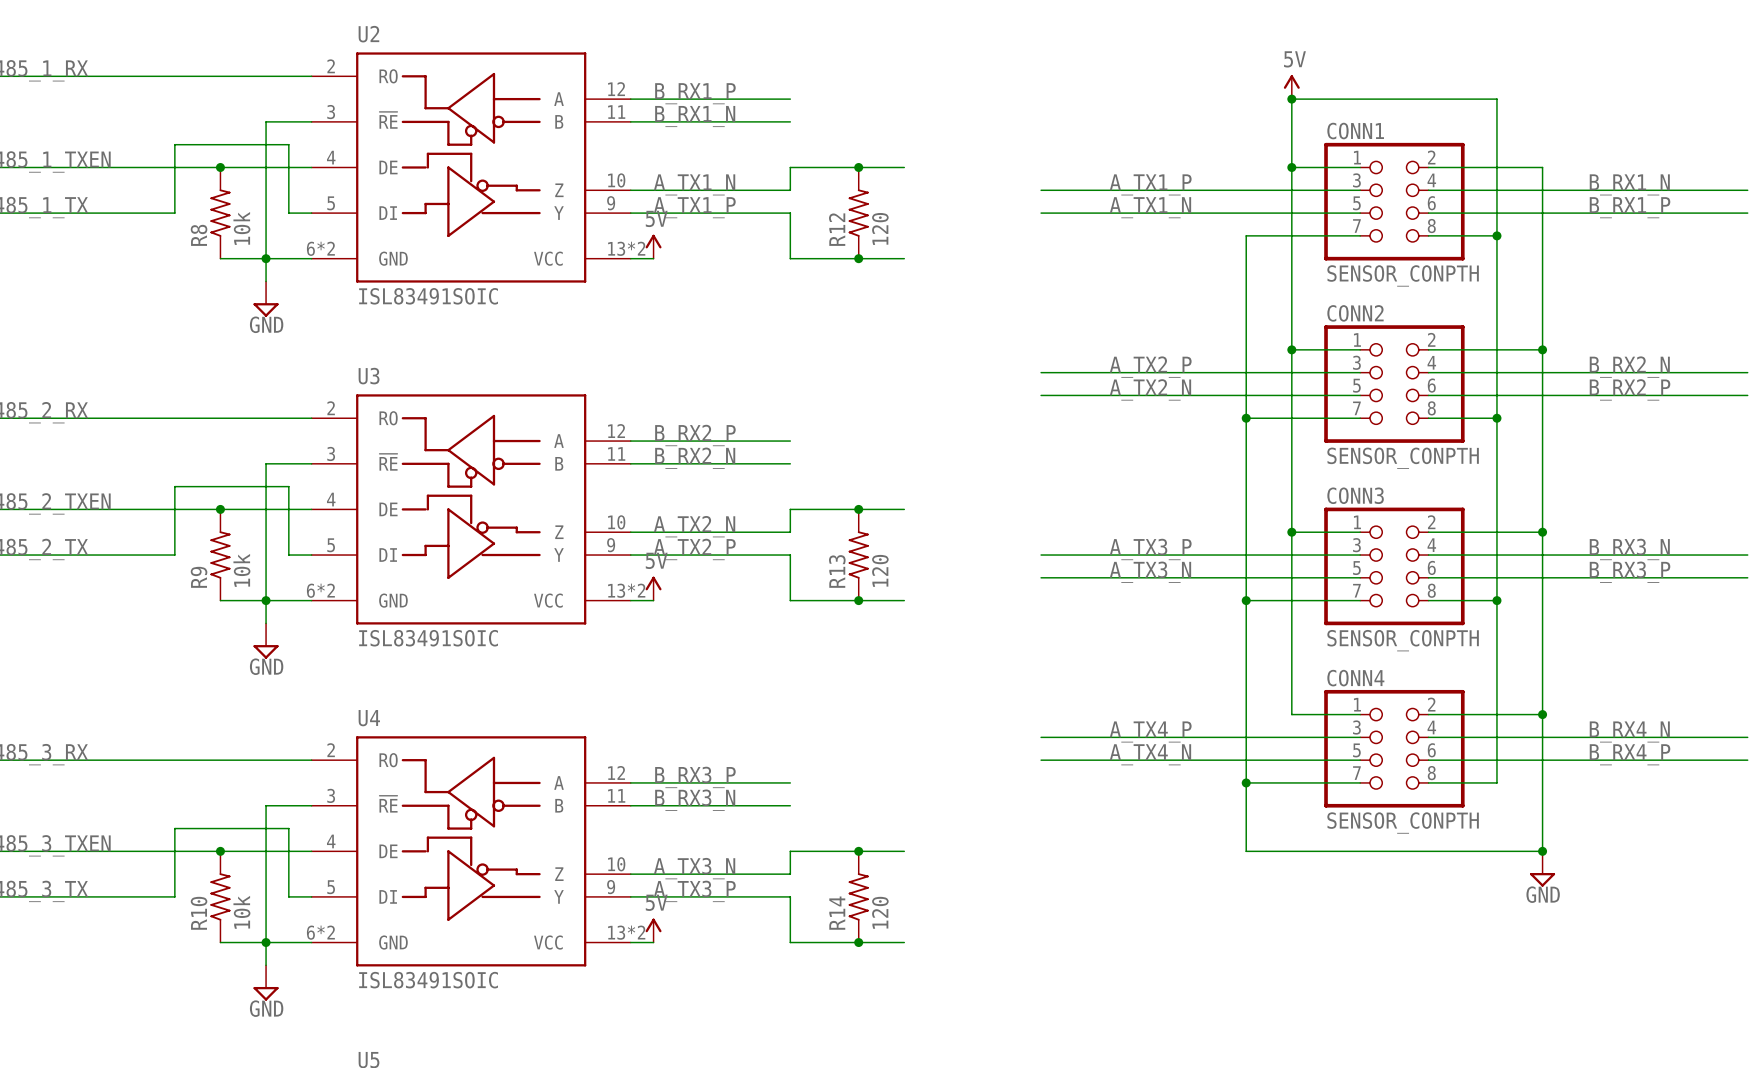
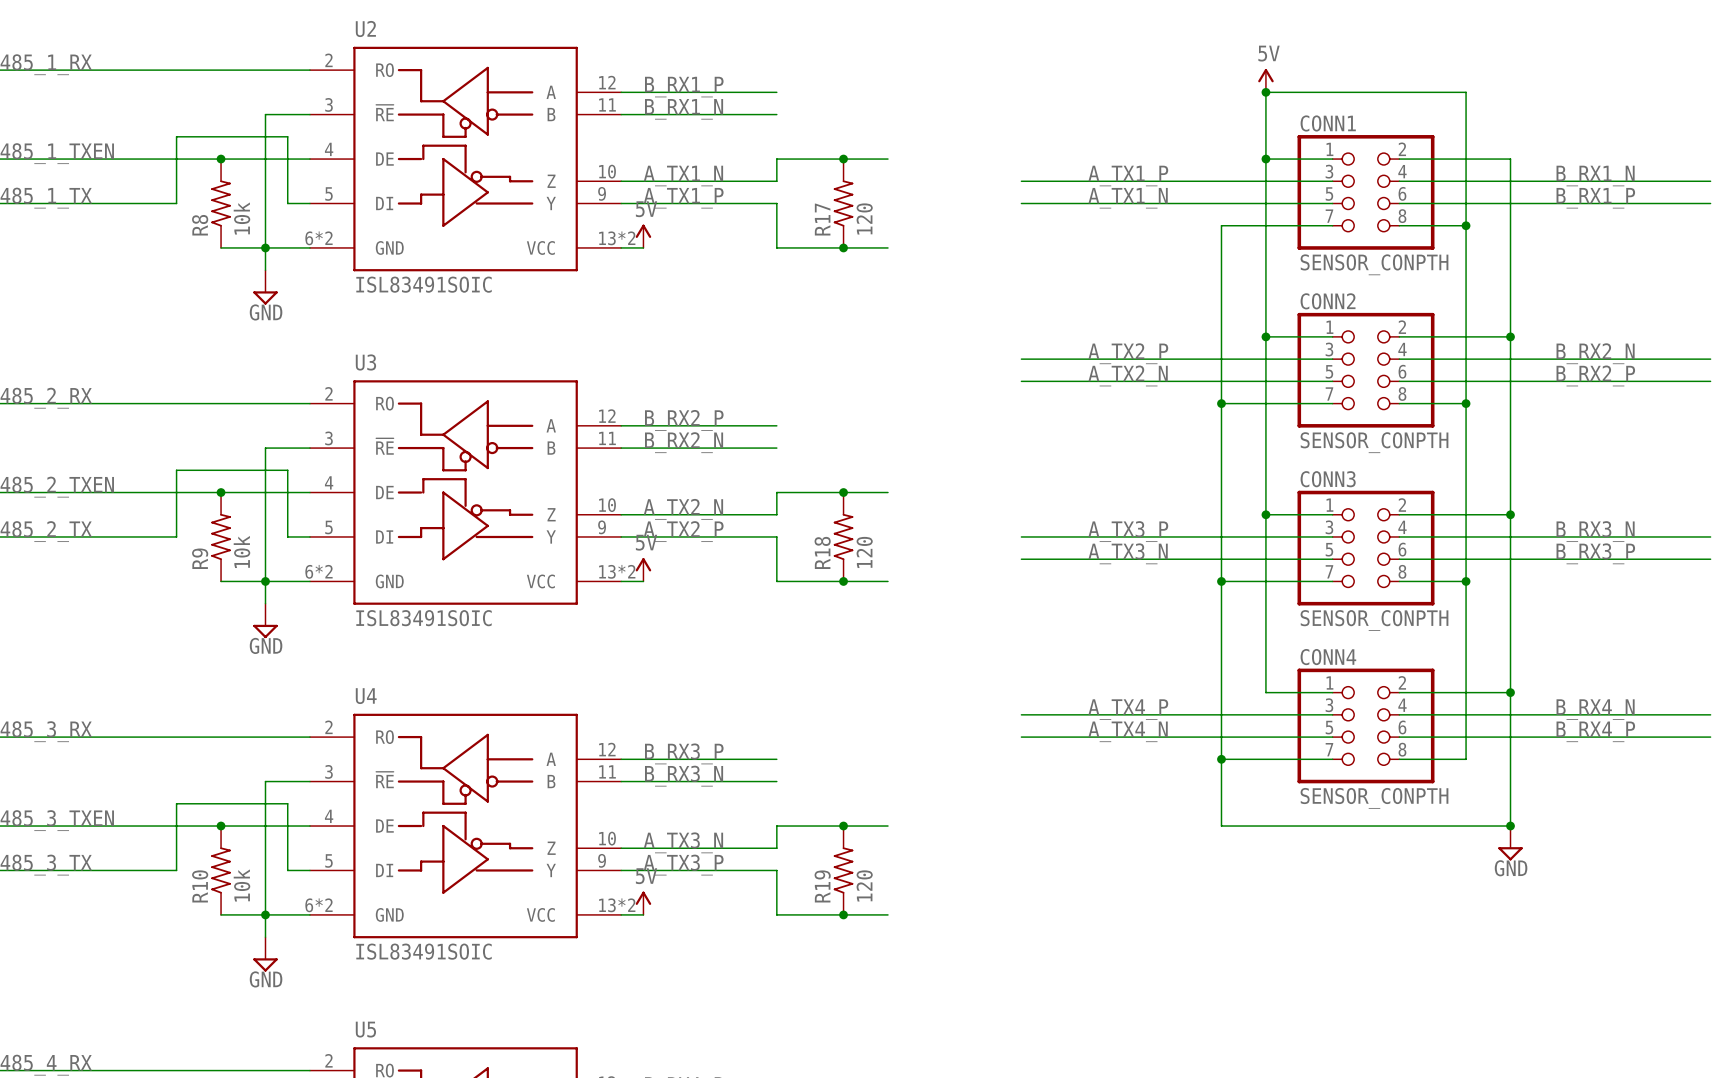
R12 name: R12 (837, 229) -> R17 (822, 219)
R13 name: R13 (837, 571) -> R18 (822, 552)
R14 name: R14 (837, 913) -> R19 (822, 886)

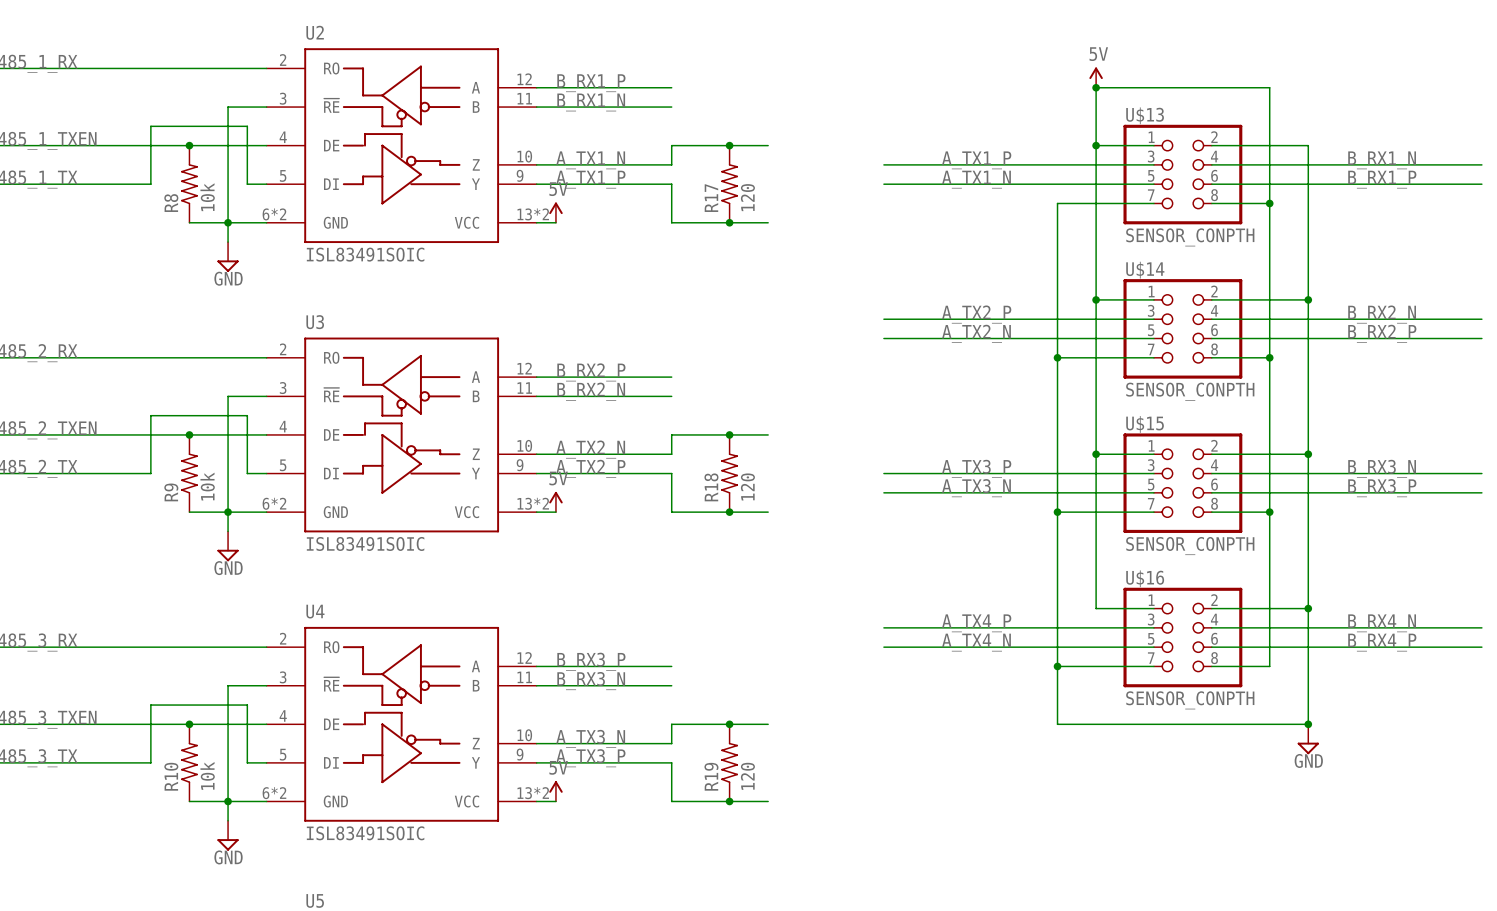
CONN1 name: CONN1 (1328, 123) -> U$13 (1145, 115)
CONN2 name: CONN2 (1328, 301) -> U$14 (1145, 270)
CONN3 name: CONN3 (1328, 479) -> U$15 (1145, 424)
CONN4 name: CONN4 (1328, 657) -> U$16 (1145, 578)

